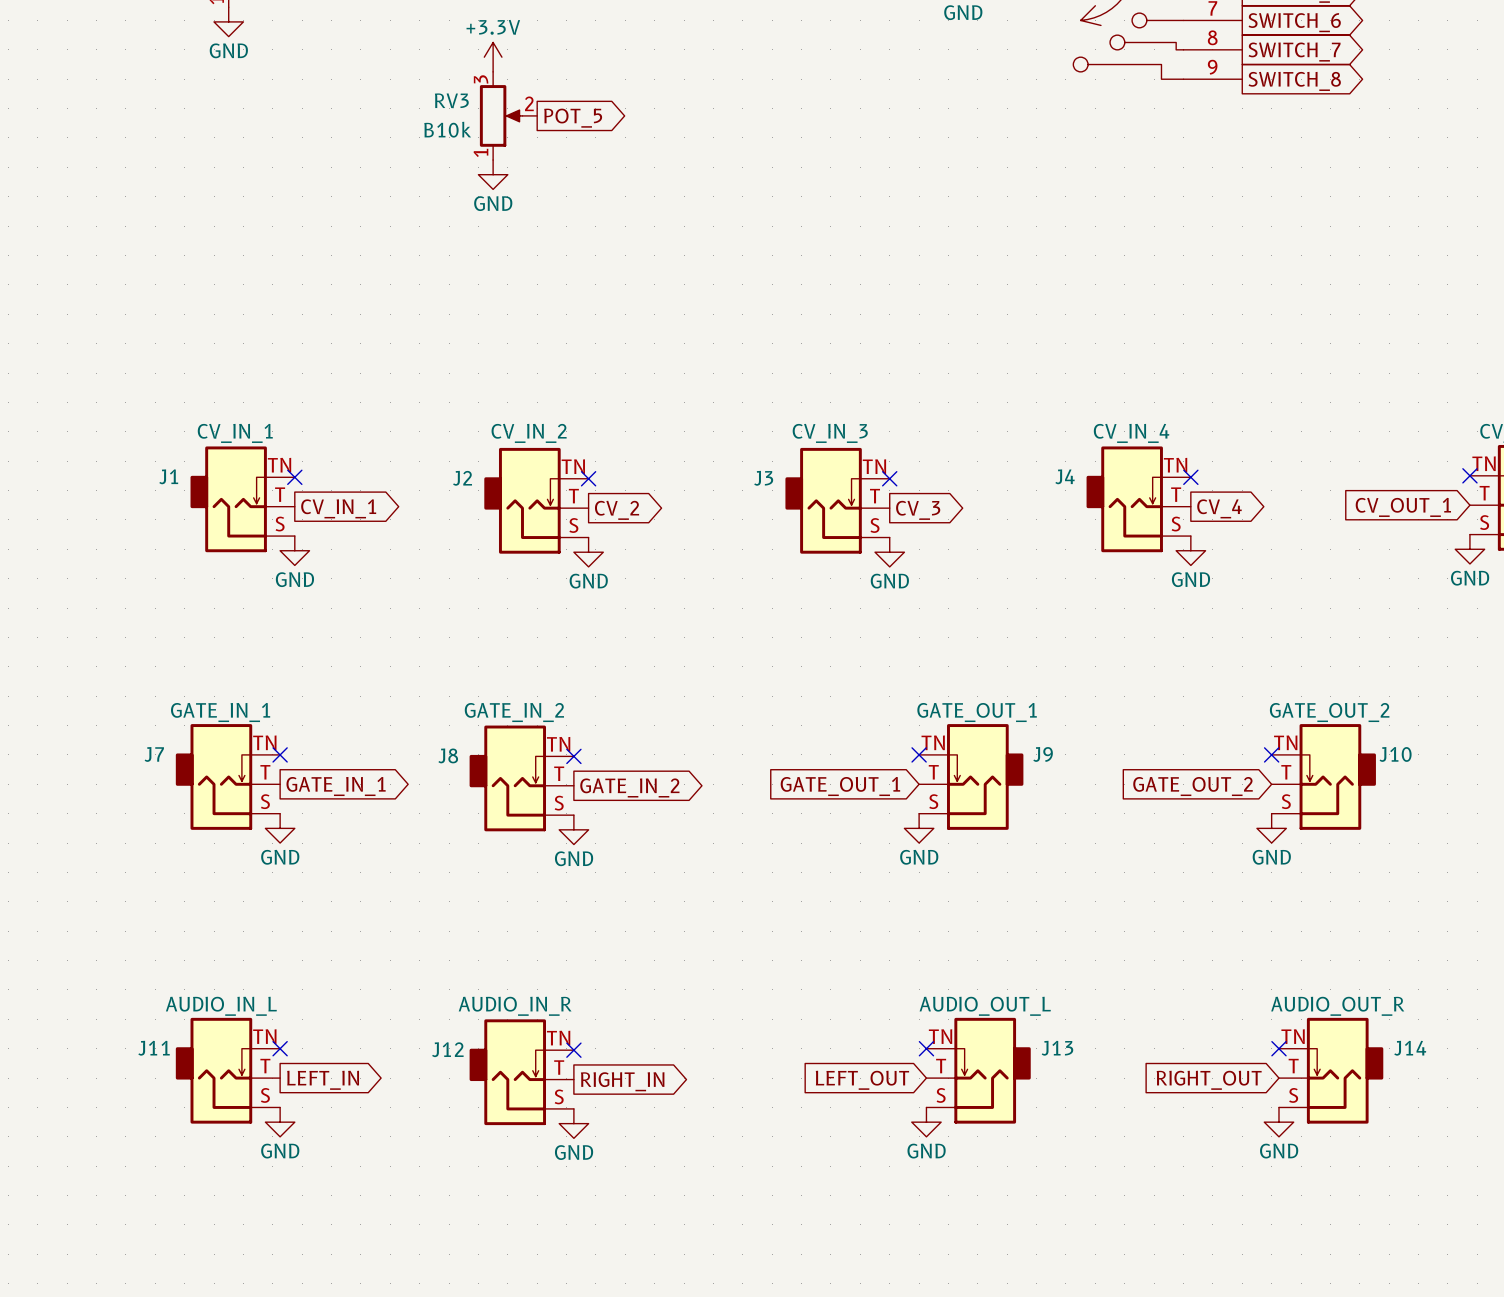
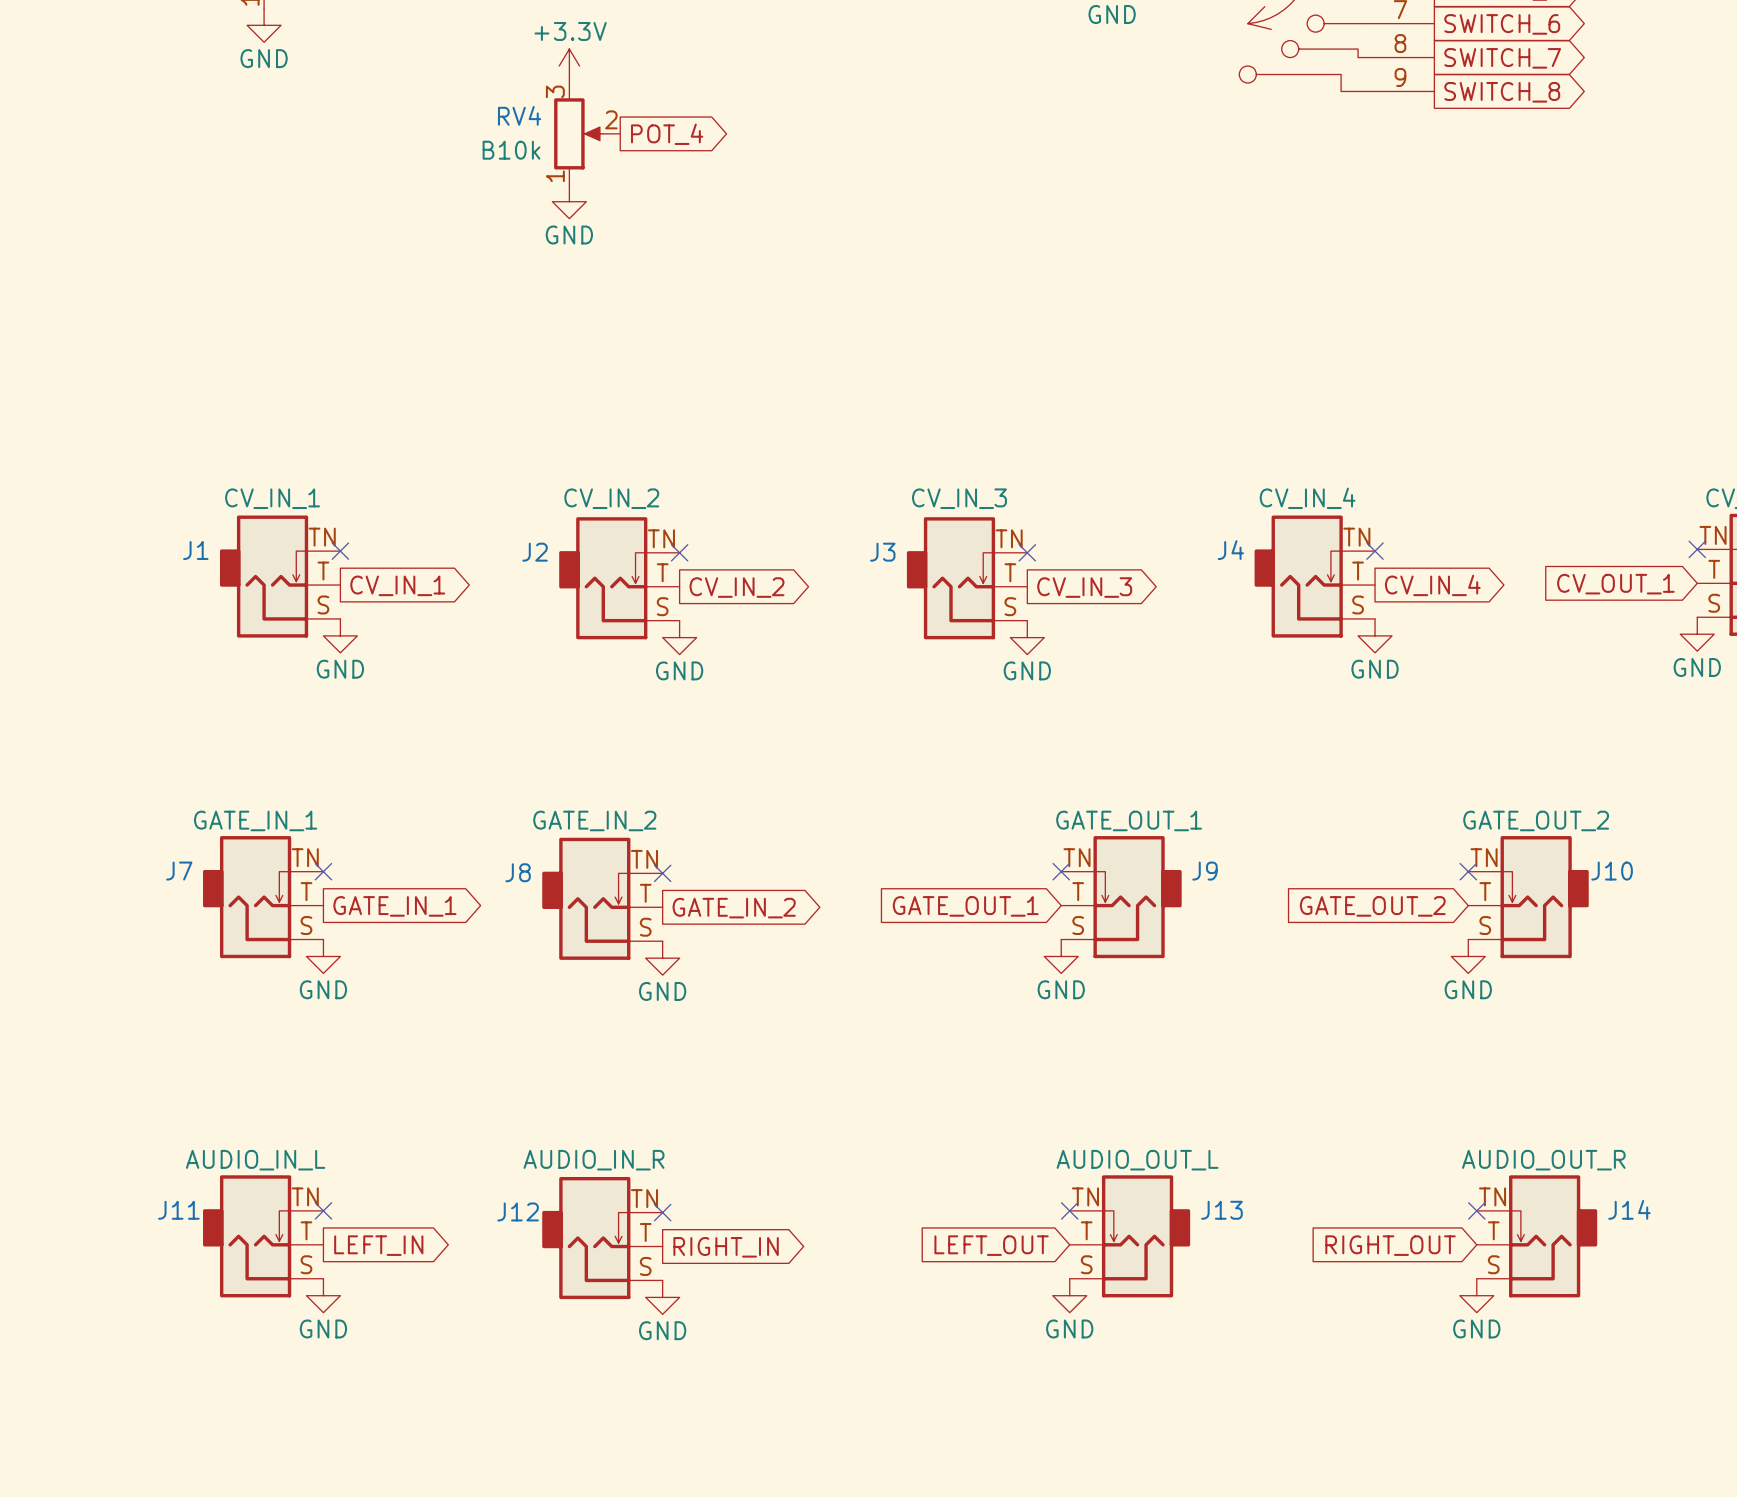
RV3 name: RV3 (451, 100) -> RV4 (519, 115)
global label: POT_5 (573, 118) -> POT_4 (667, 134)
global label: CV_4 (1219, 508) -> CV_IN_4 (1432, 585)
global label: CV_2 (617, 510) -> CV_IN_2 (736, 587)
global label: CV_3 (918, 510) -> CV_IN_3 (1084, 587)

